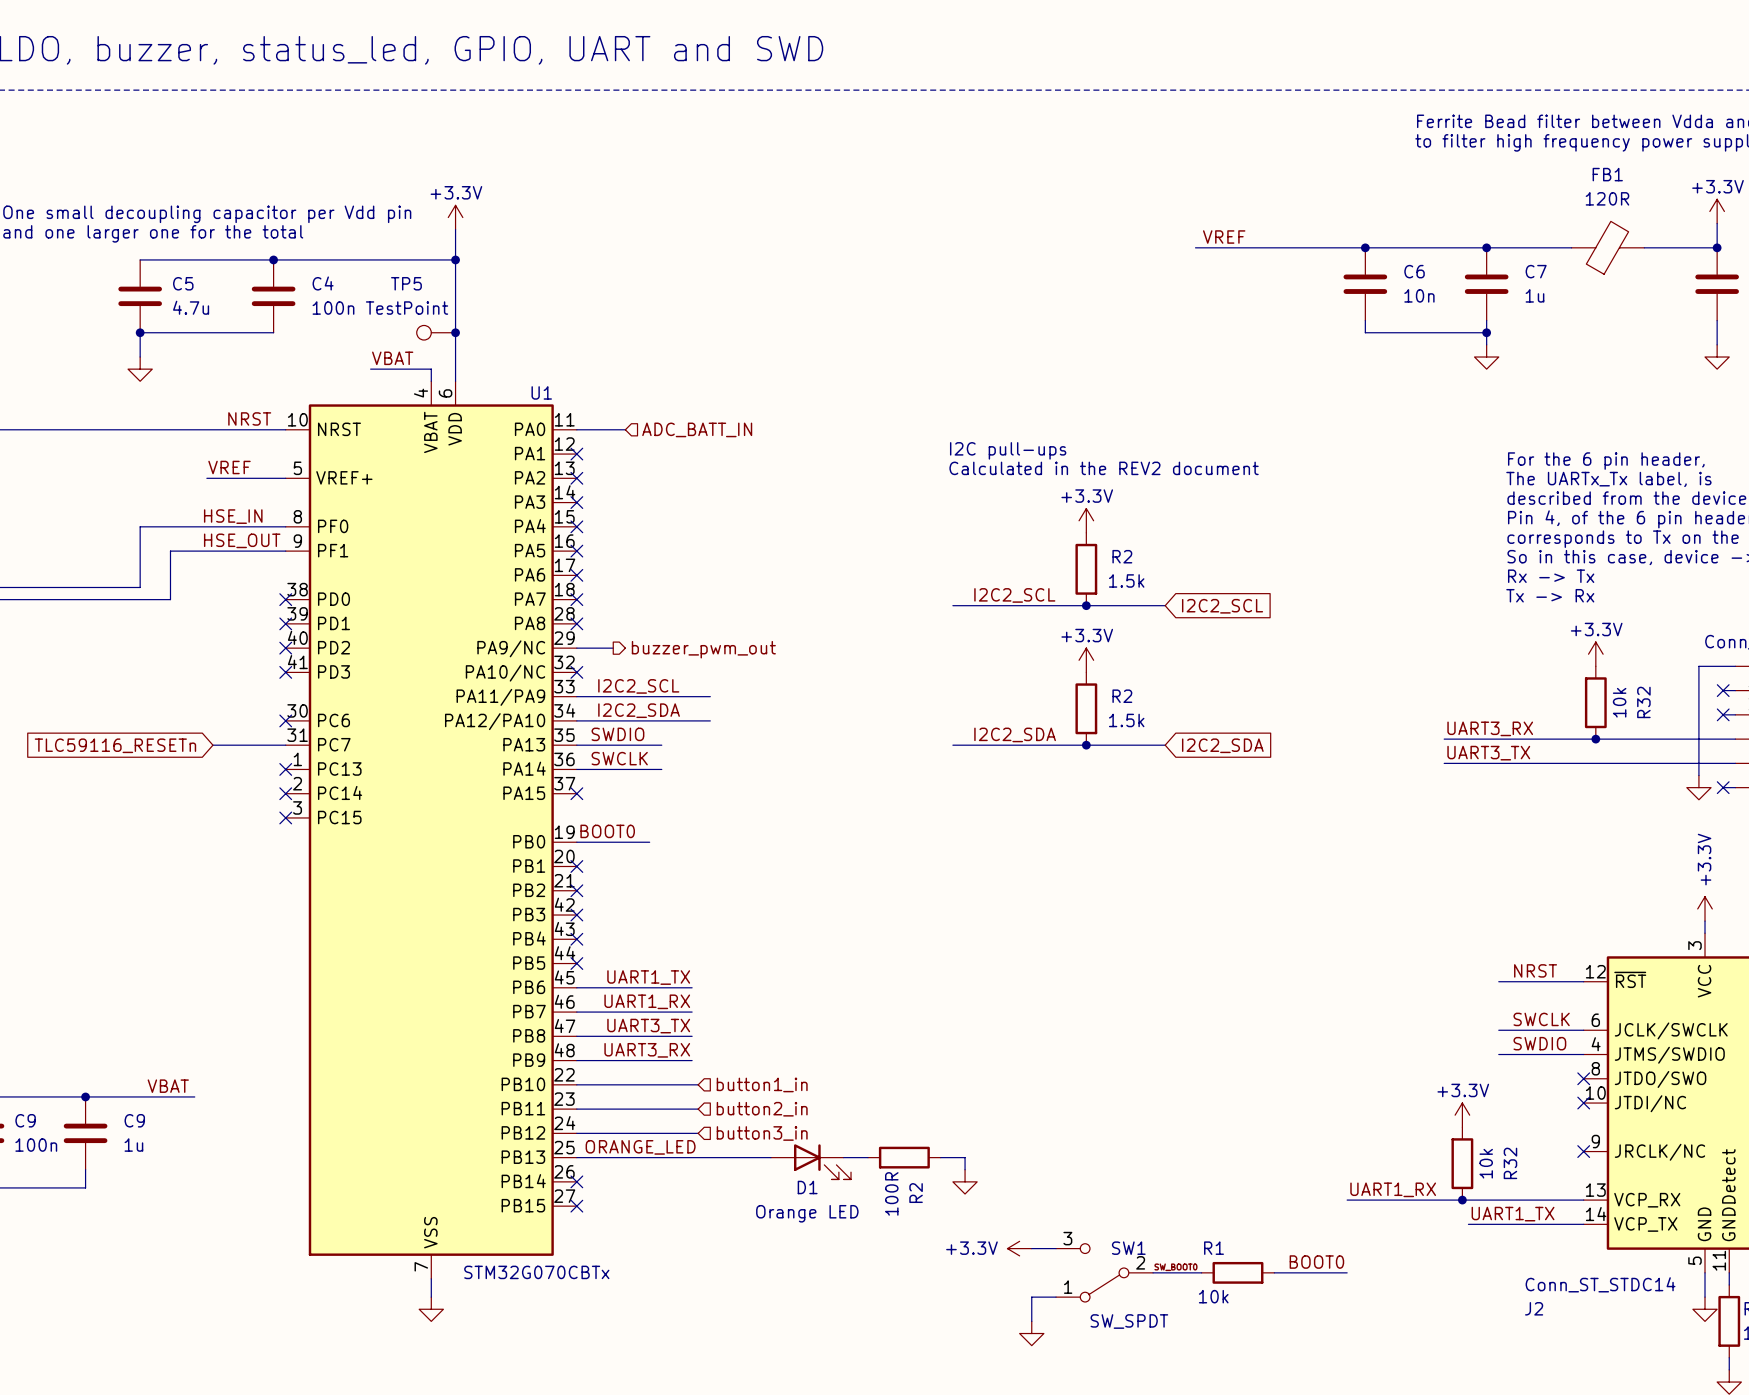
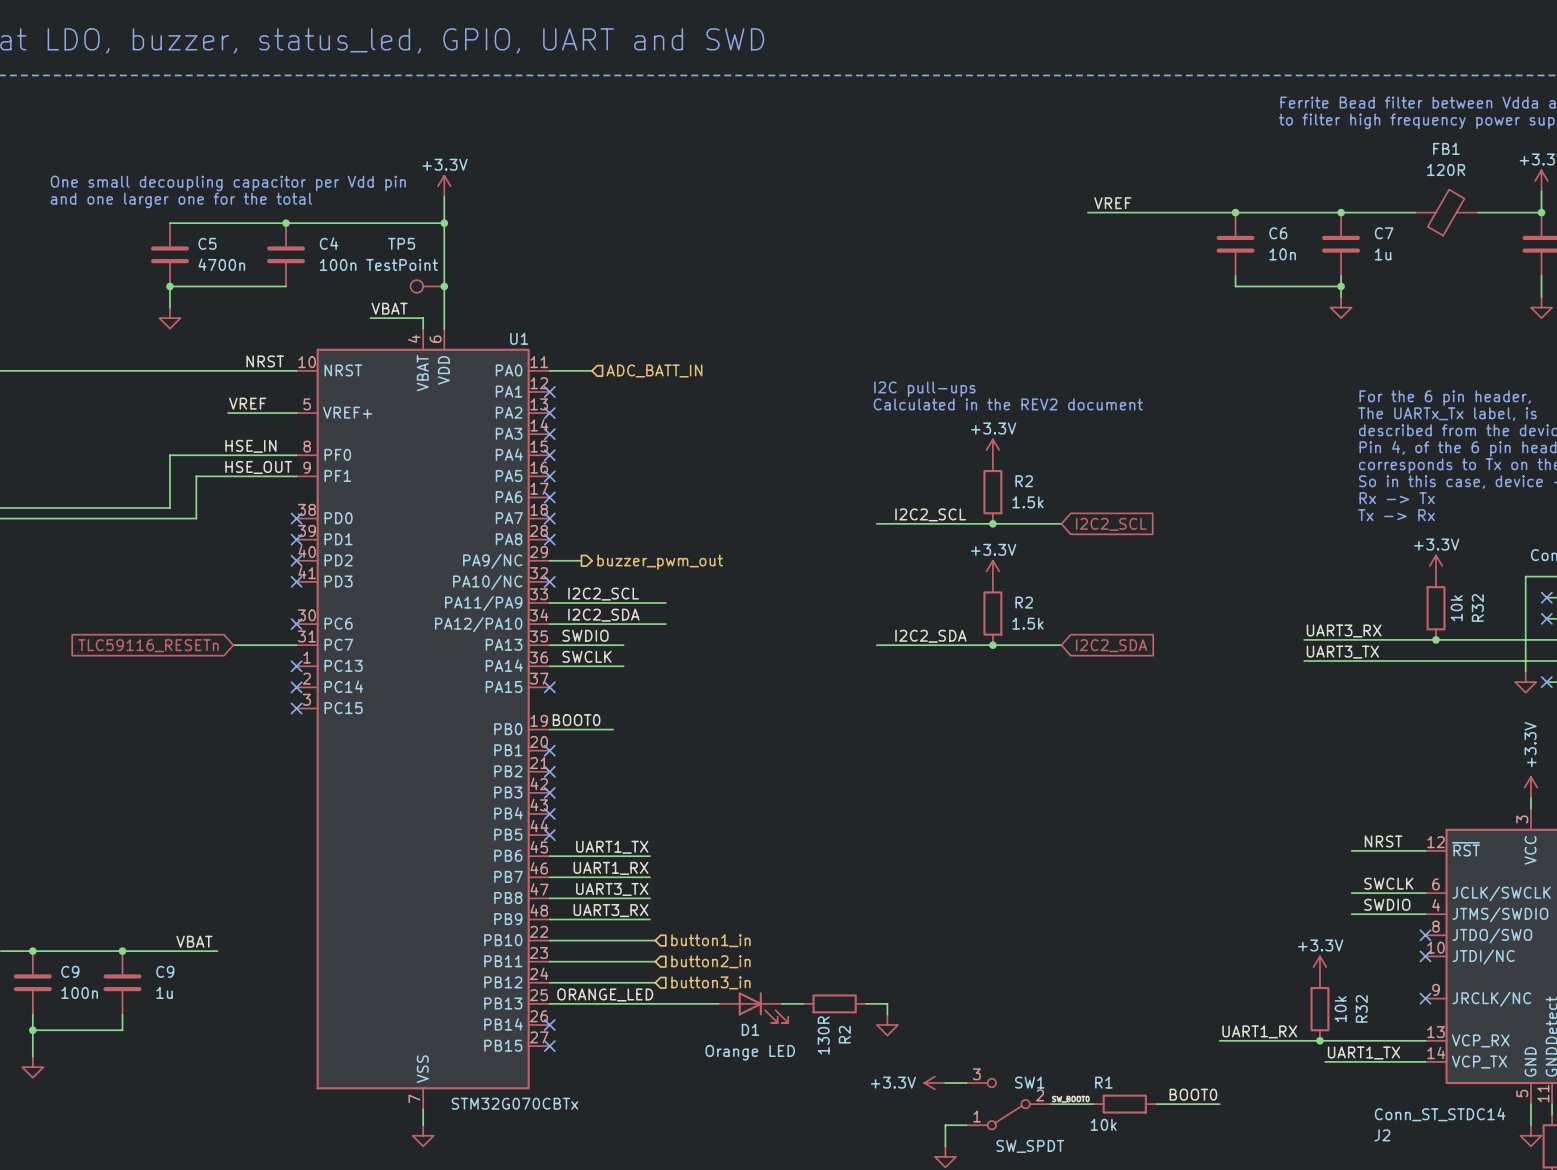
C5 value: 4.7u (191, 307) -> 4700n (221, 264)
R2 value: 100R (891, 1193) -> 130R (823, 1035)

